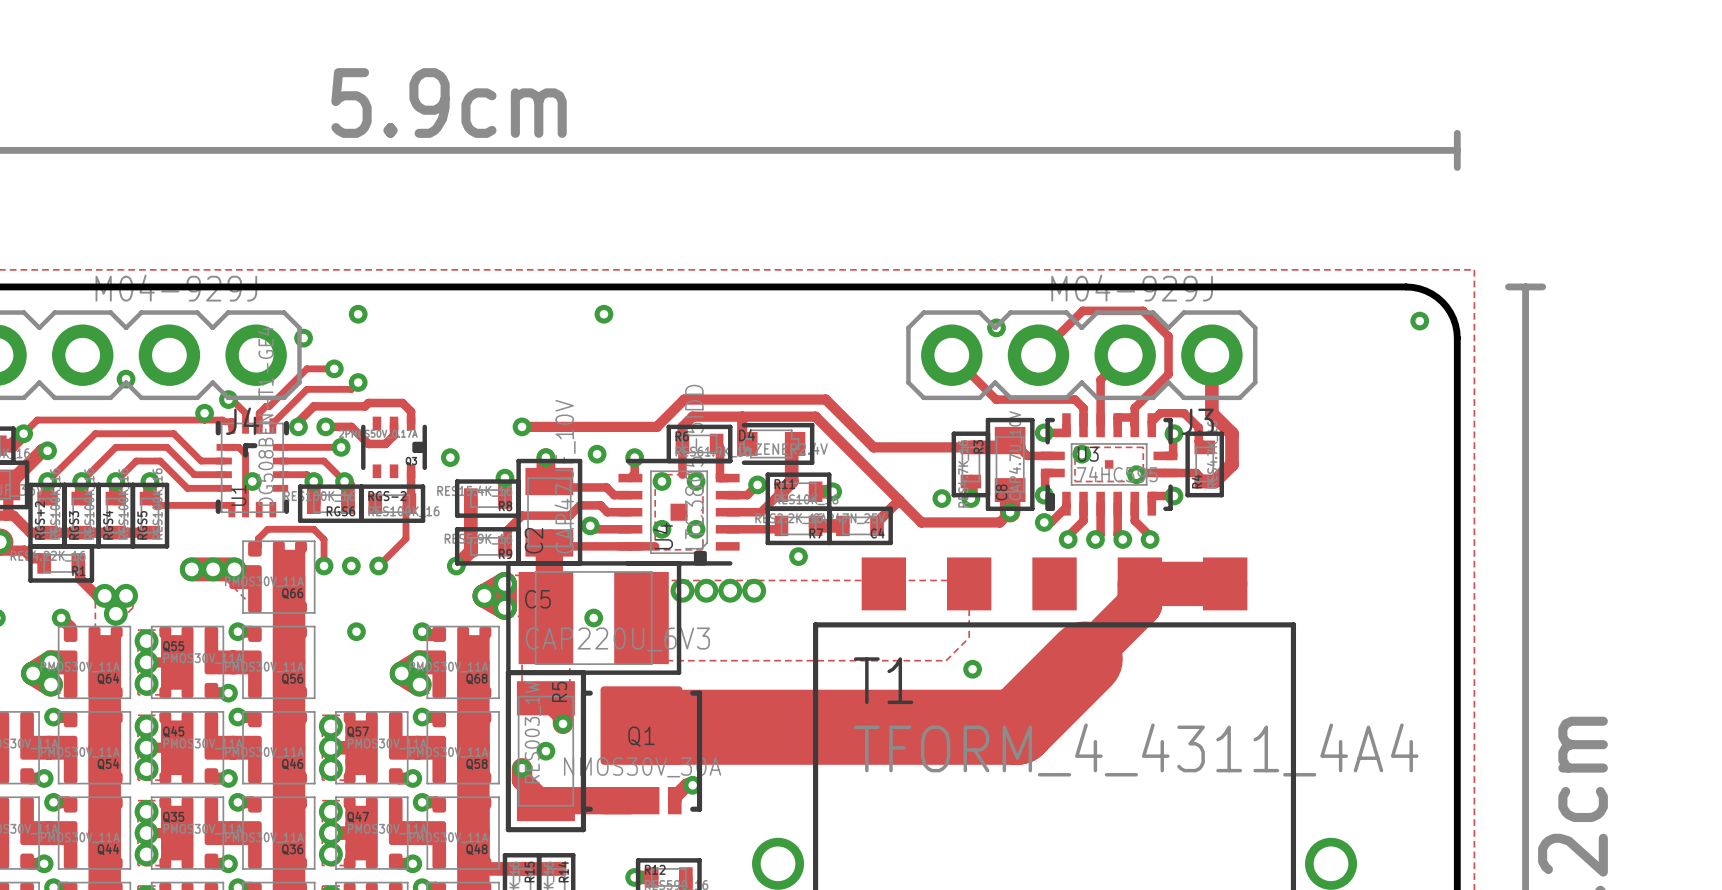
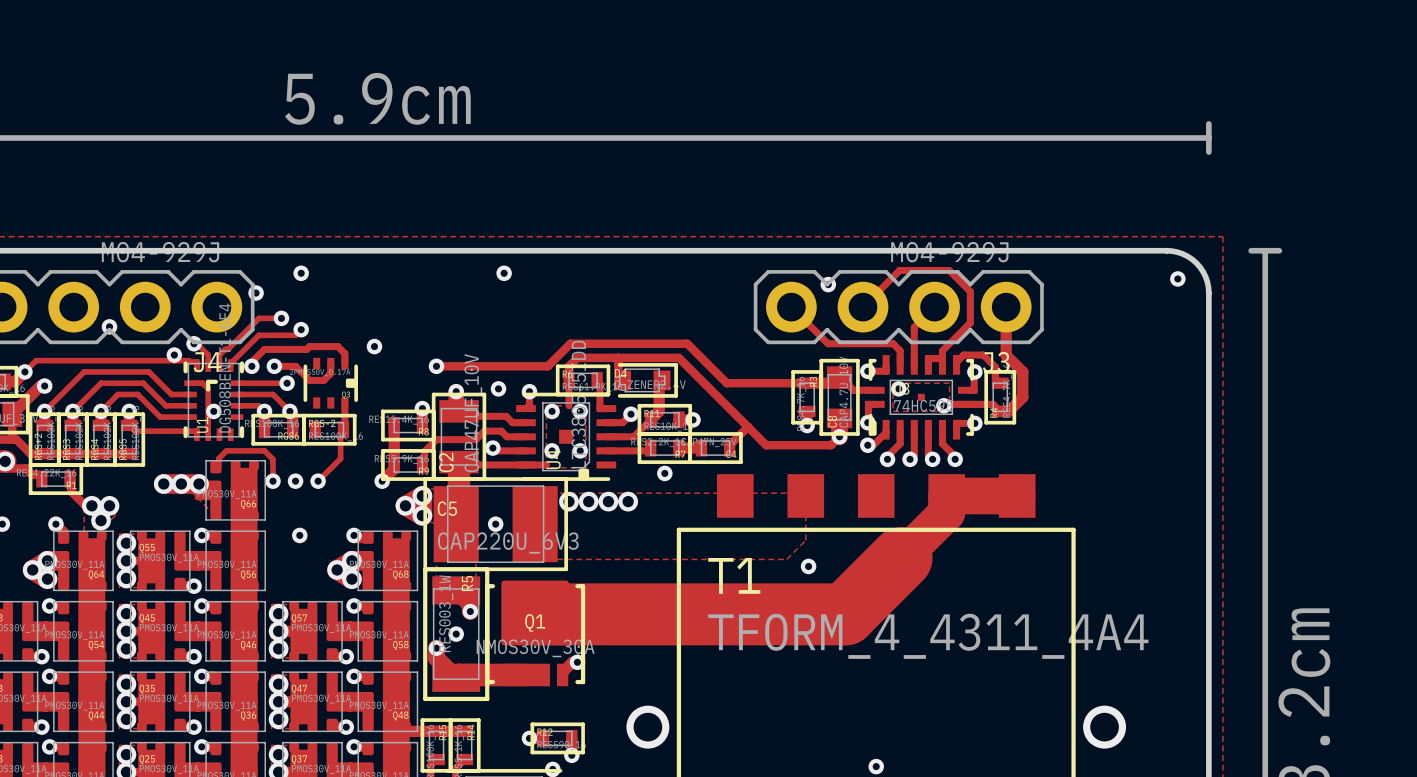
via position: (450, 457) -> (374, 346)
via: (941, 498) -> none

